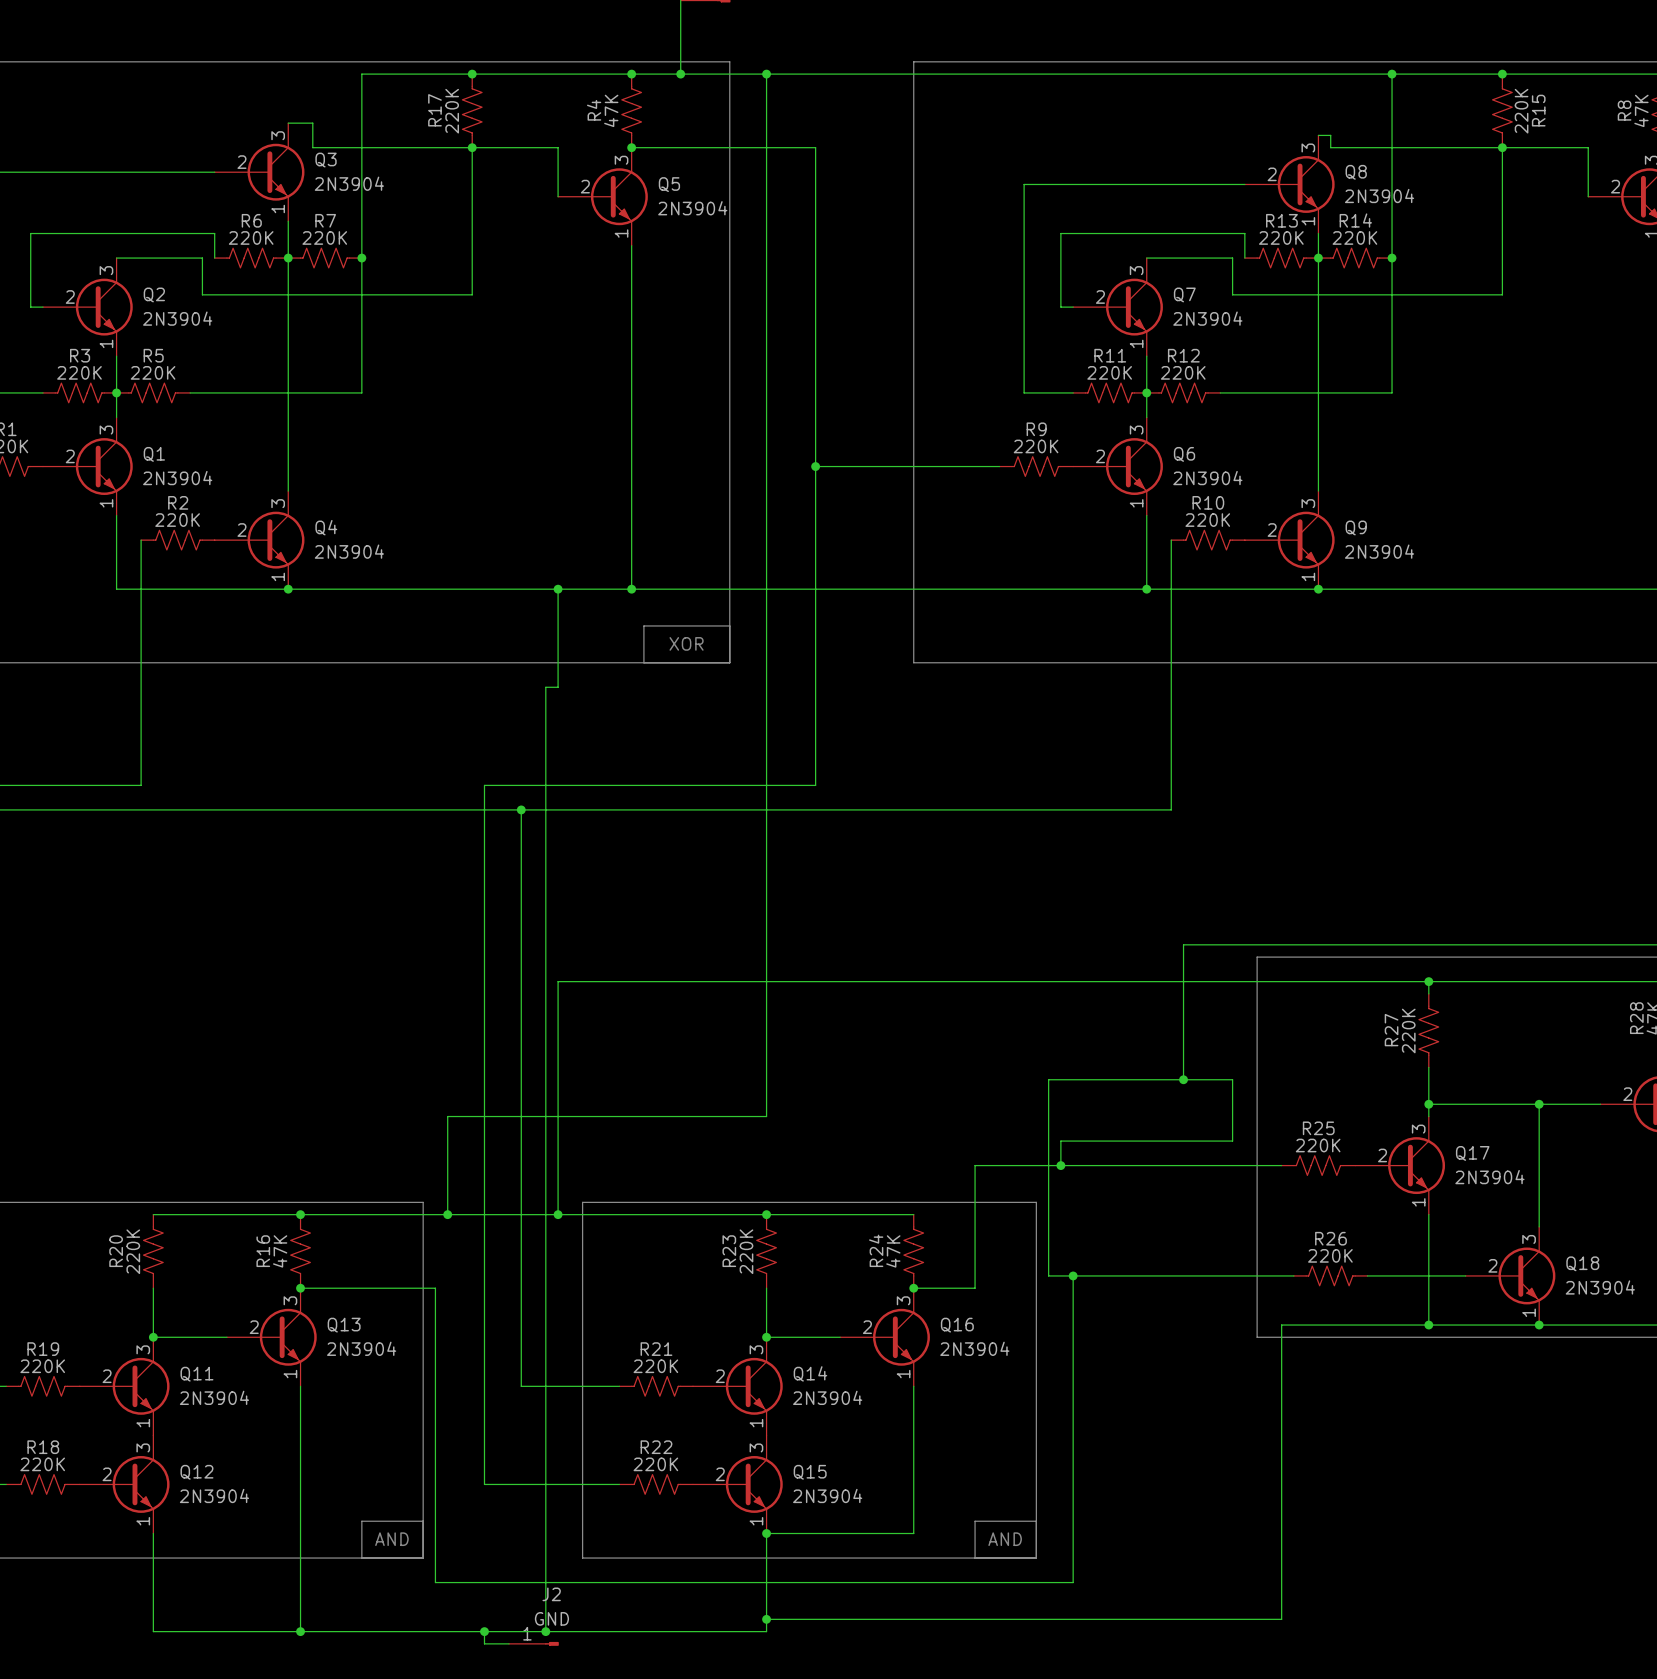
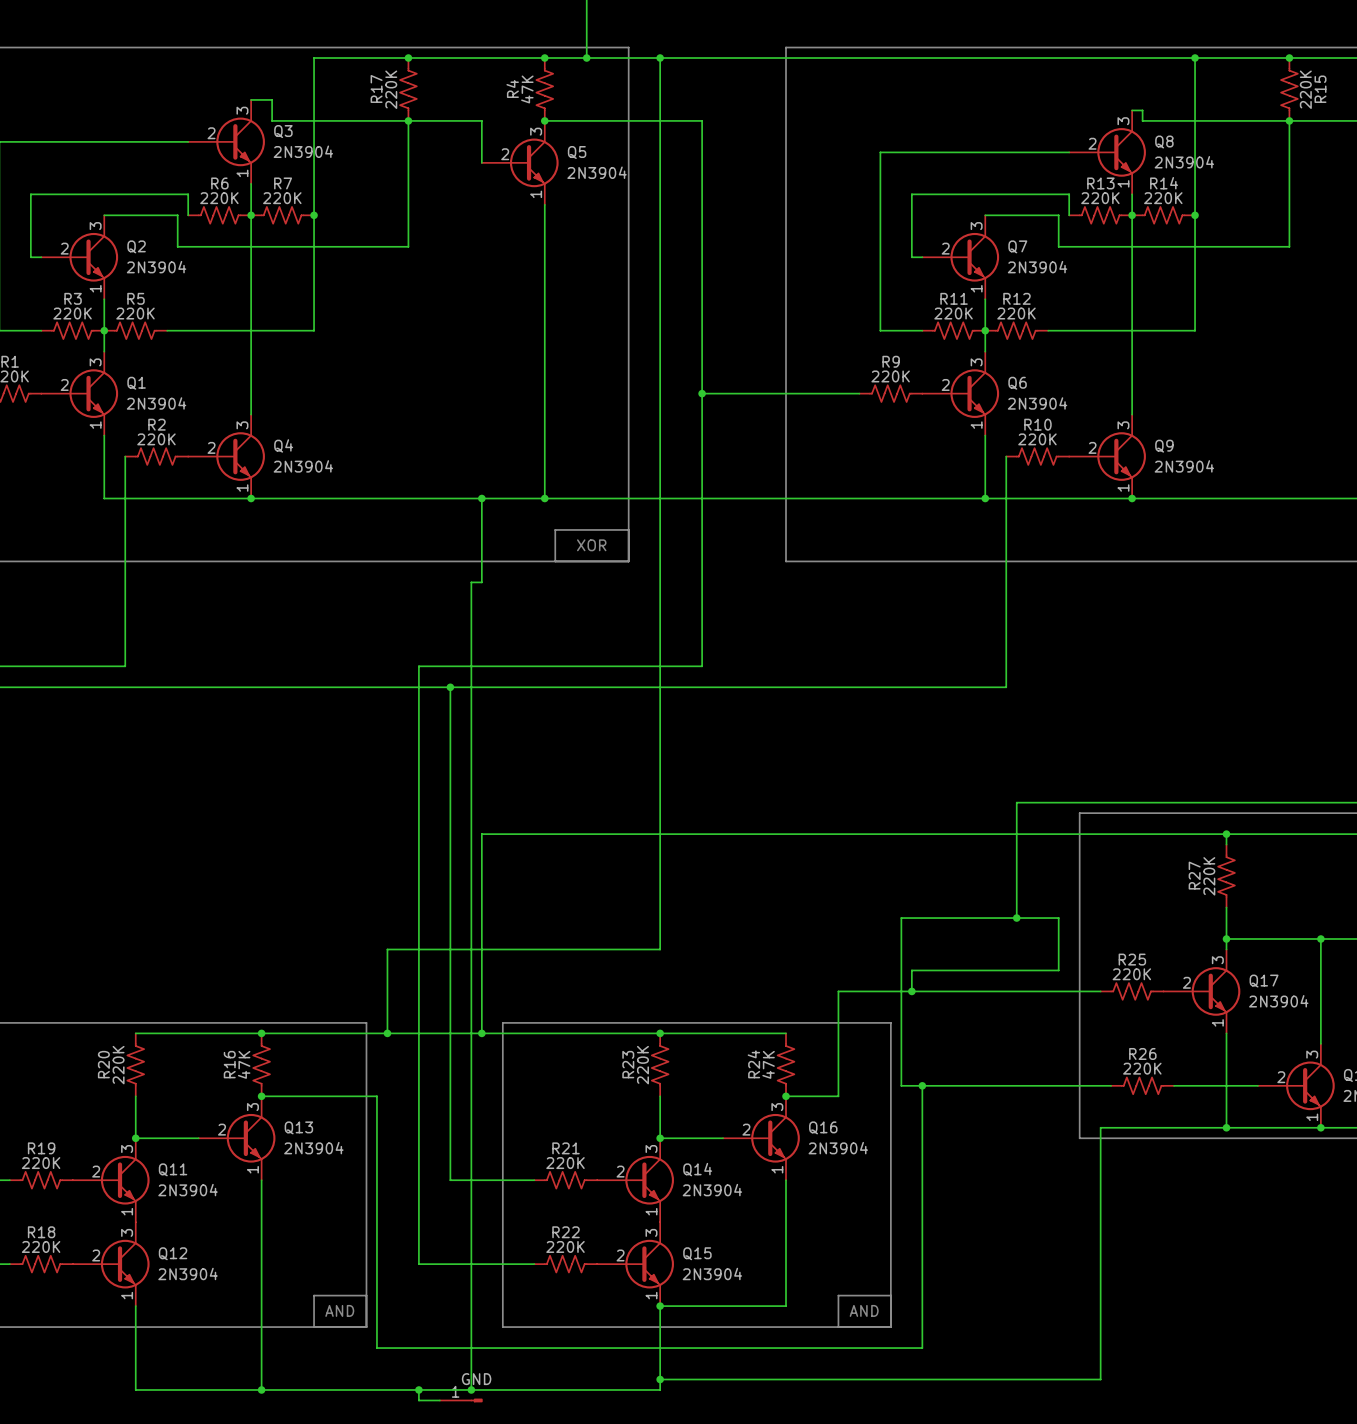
J2 name: J2 (551, 1594) -> none

